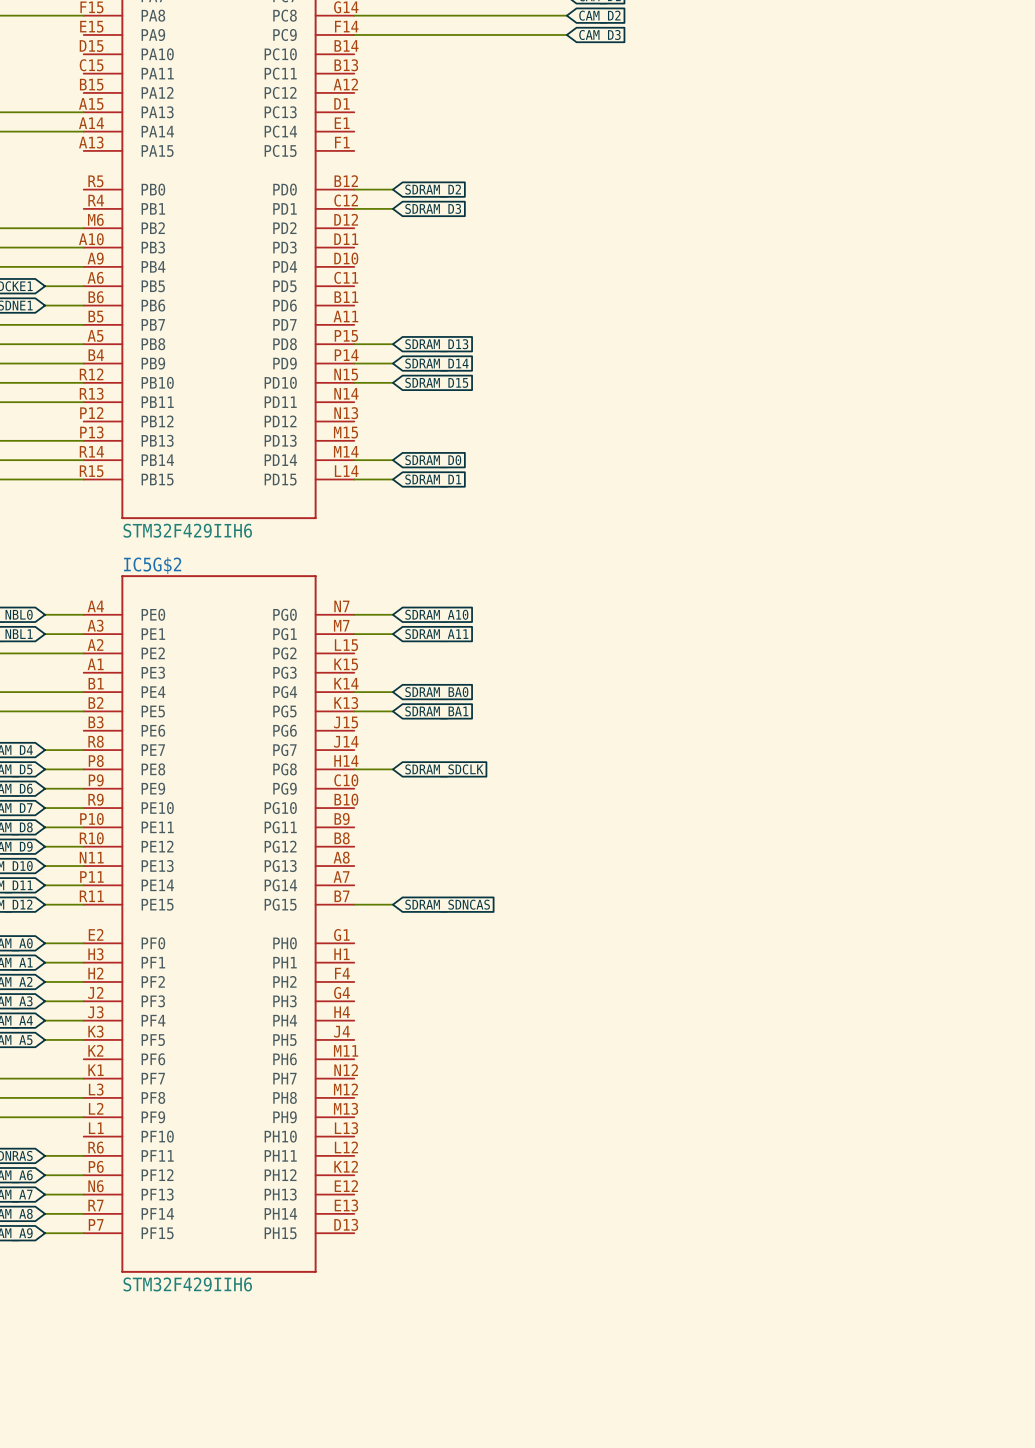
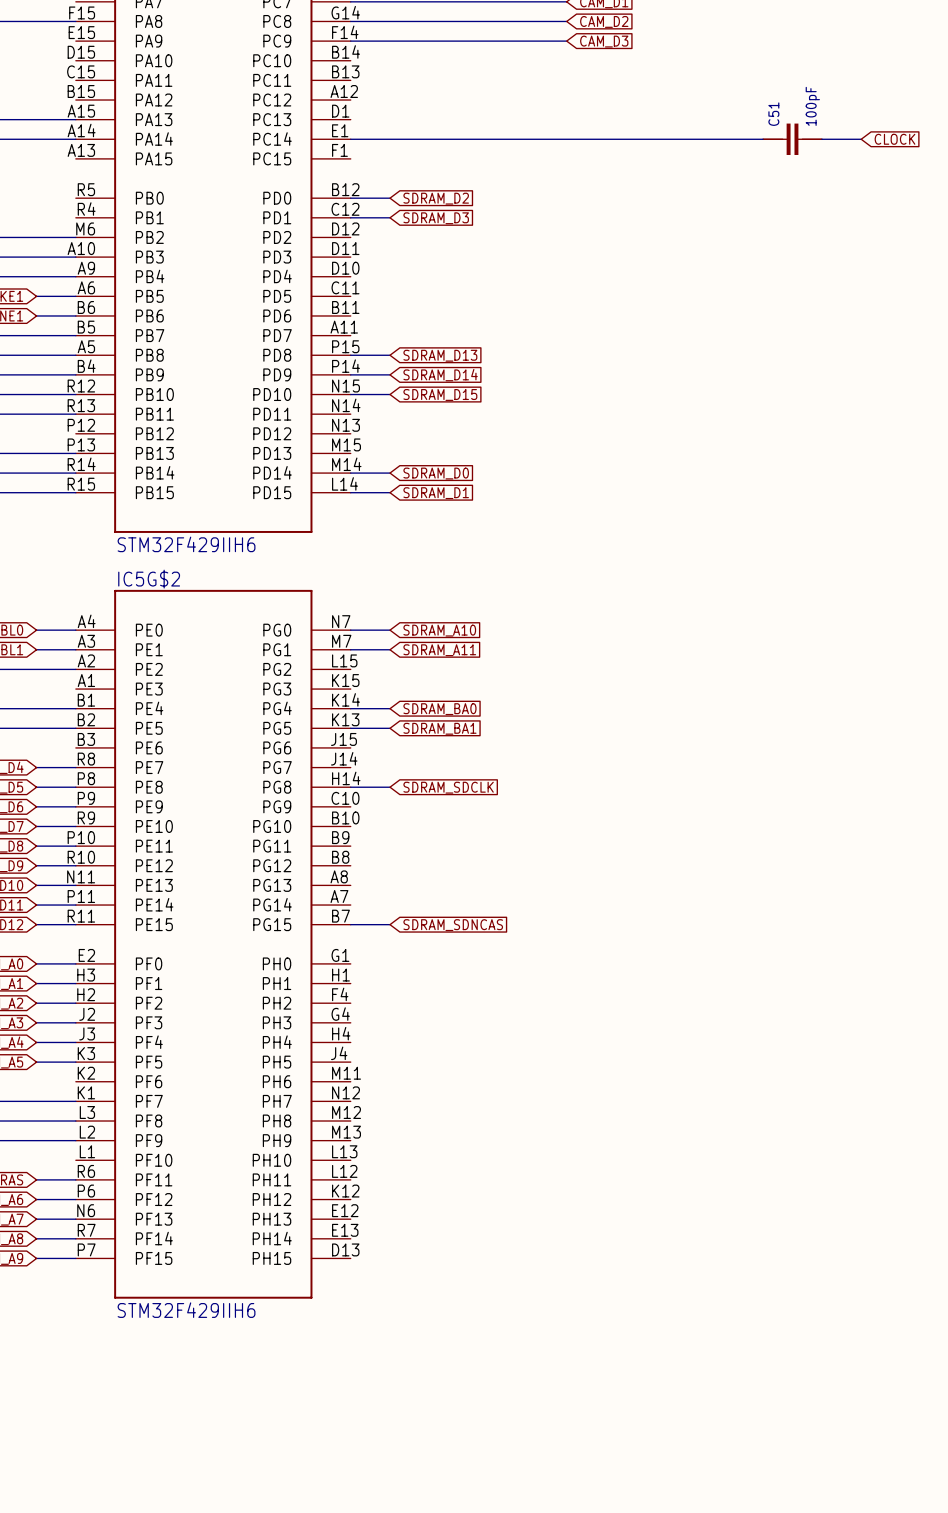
wire: none -> (350, 139) (763, 139)
C51: none -> 100pF (792, 139)
wire: none -> (821, 139) (861, 139)
global label: none -> CLOCK (894, 139)

